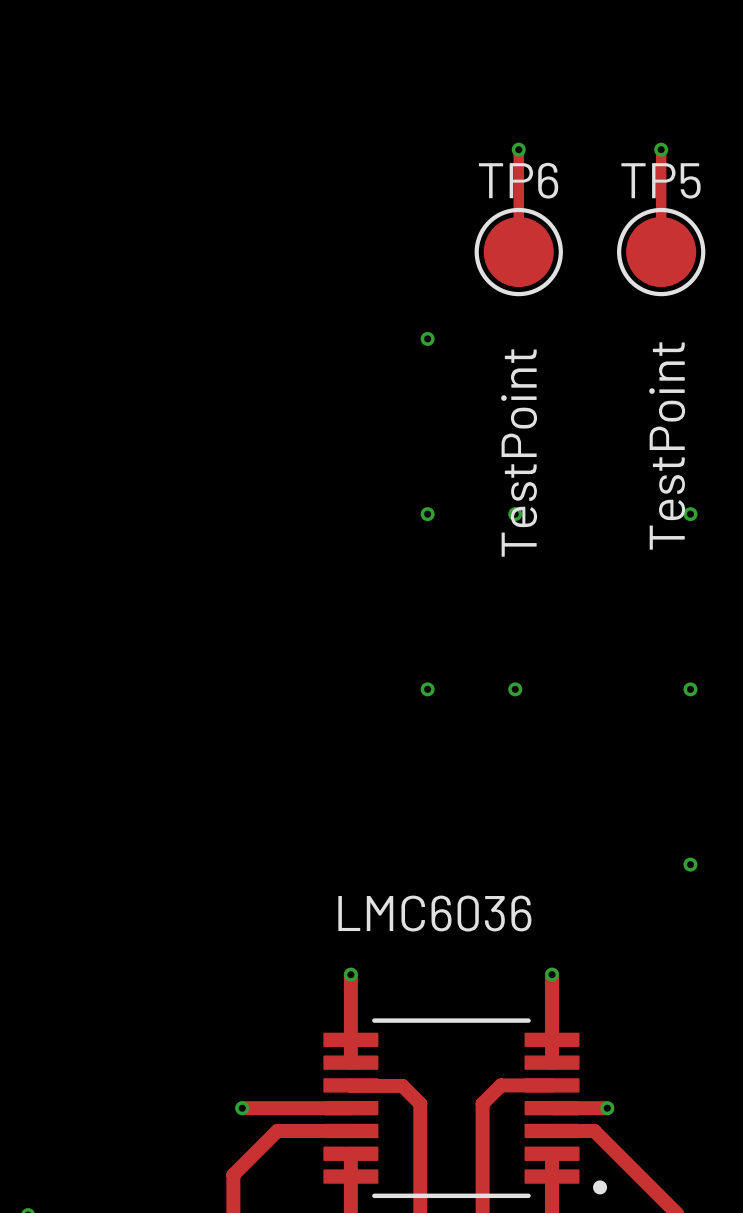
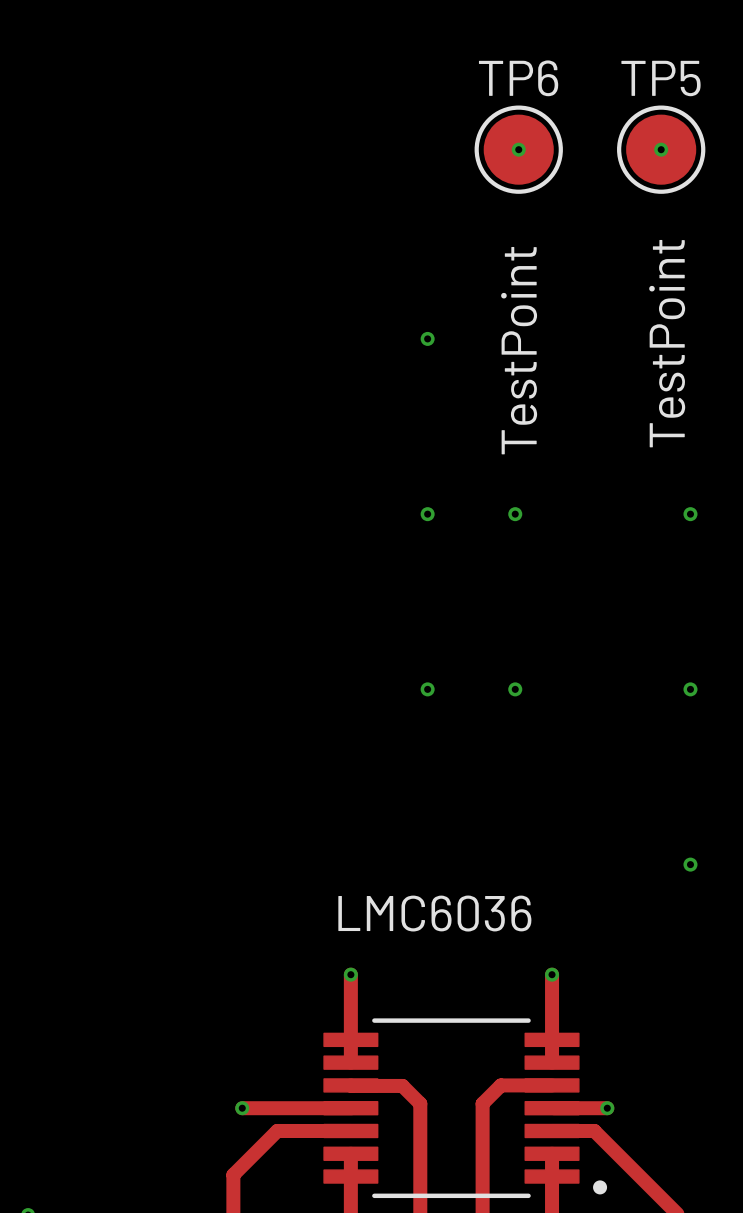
top track: (518, 149) (518, 252) -> none
top track: (661, 149) (661, 252) -> none
TP6 position: (518, 252) -> (518, 149)
TP5 position: (661, 252) -> (661, 149)

